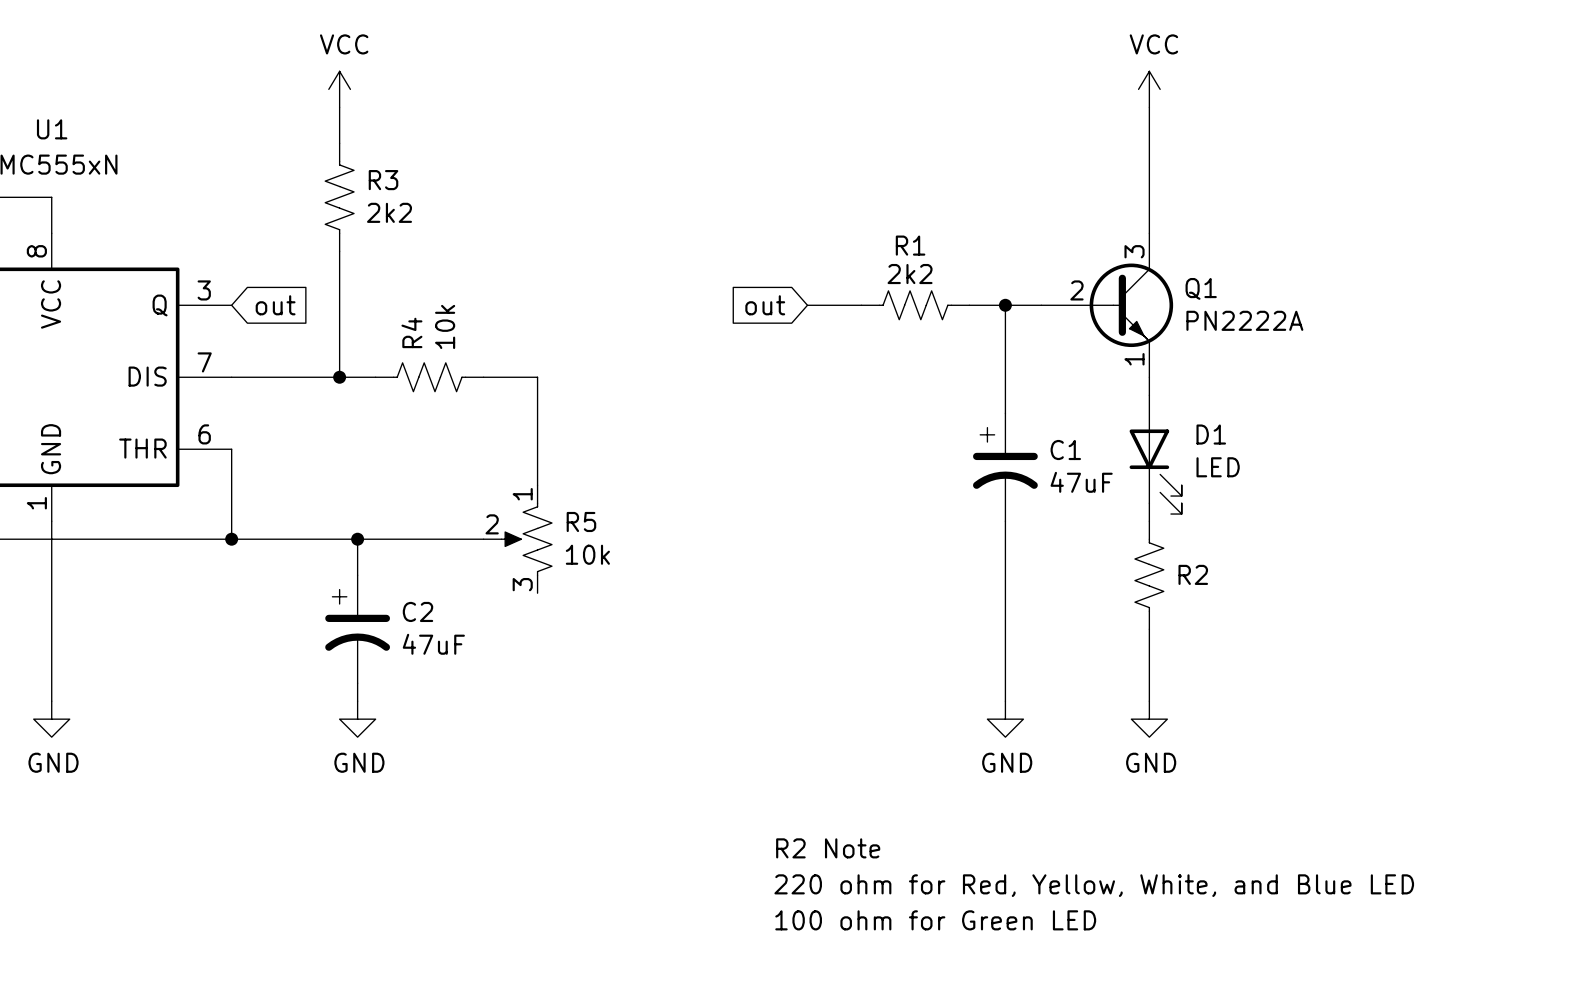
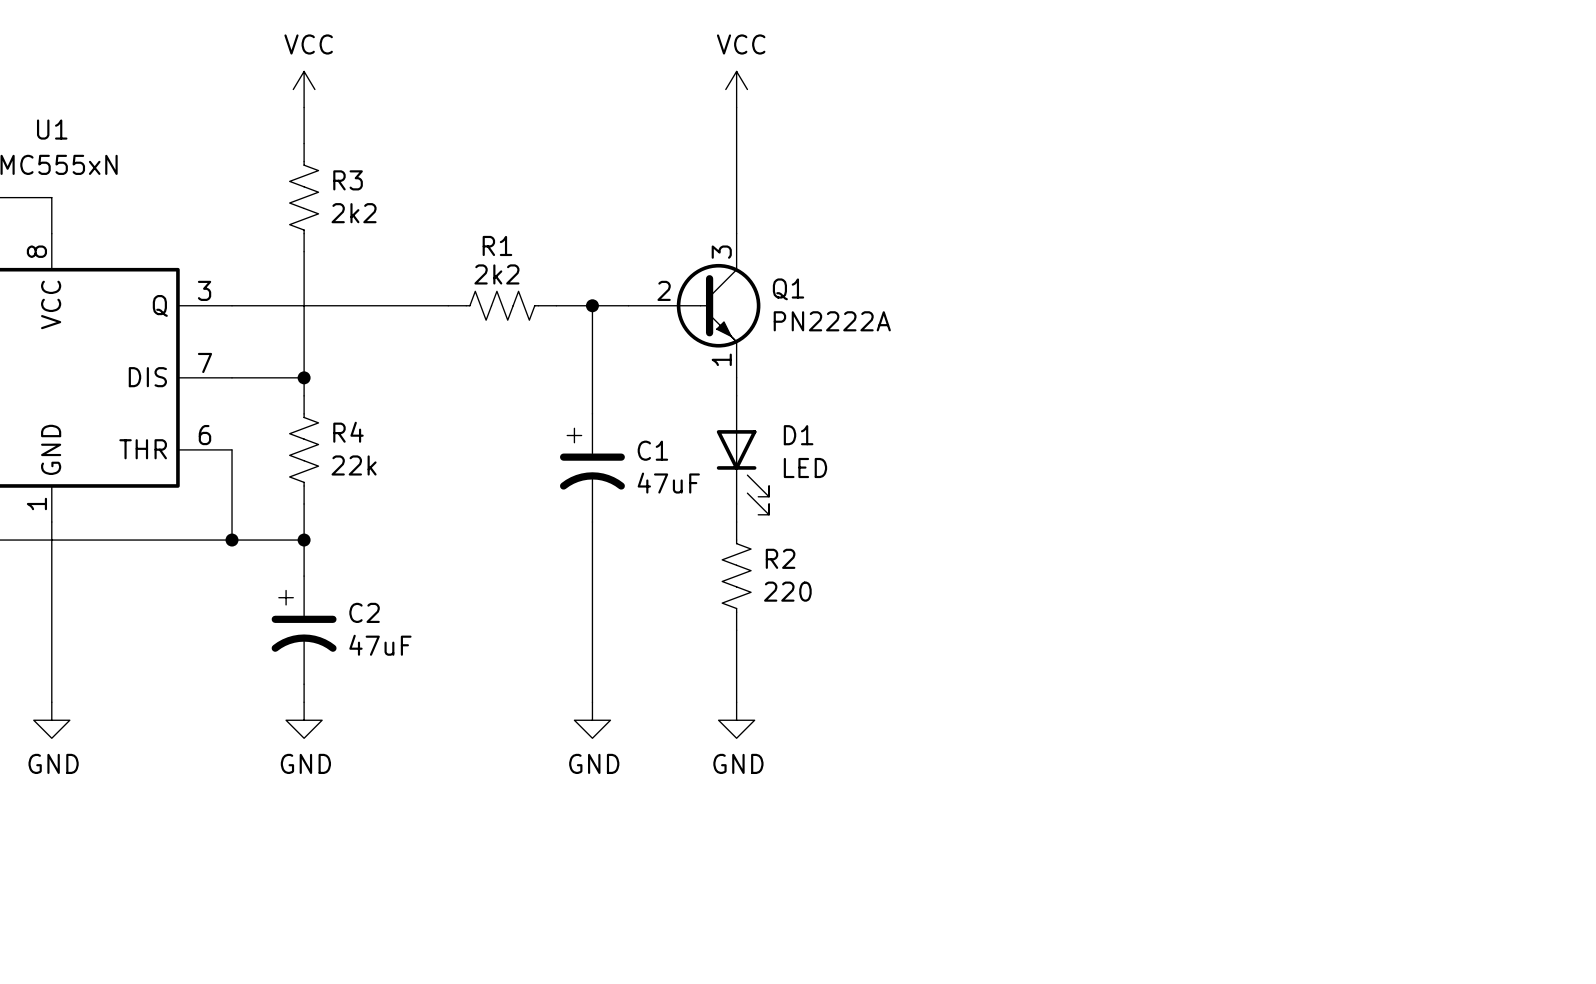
power symbol position: VCC (339, 89) -> VCC (304, 89)
power symbol: none -> VCC (736, 89)
power symbol: VCC (1149, 89) -> none
wire: (339, 107) (339, 143) -> (304, 107) (304, 143)
wire: none -> (736, 107) (736, 233)
wire: (1149, 107) (1149, 233) -> none
R3 position: (339, 197) -> (304, 197)
wire: none -> (304, 251) (304, 395)
wire: (339, 251) (339, 377) -> none
wire: none -> (232, 305) (448, 305)
global label: out (275, 305) -> none
wire: none -> (592, 305) (592, 413)
junction: none -> (592, 305)
global label: out (765, 305) -> none
wire: (807, 305) (861, 305) -> none
R1 position: (915, 305) -> (502, 305)
wire: (969, 305) (1041, 305) -> none
wire: (1005, 305) (1005, 413) -> none
junction: (1005, 305) -> none
Q1 position: (1107, 305) -> (694, 305)
R4 value: 10k (445, 326) -> 22k (354, 465)
wire: (303, 377) (375, 377) -> (556, 305) (628, 305)
junction position: (339, 377) -> (304, 377)
R4 rotation: 0° (429, 377) -> 90° clockwise (304, 449)
R4 position: (429, 377) -> (304, 449)
wire: (483, 377) (537, 377) (537, 485) -> none
wire: none -> (736, 377) (736, 395)
wire: (1149, 377) (1149, 395) -> none
D1 position: (1155, 454) -> (742, 455)
C1 position: (1005, 467) -> (592, 467)
wire: none -> (304, 503) (304, 576)
wire: none -> (736, 503) (736, 522)
wire: (1149, 503) (1149, 521) -> none
wire: none -> (592, 522) (592, 702)
wire: (1005, 521) (1005, 701) -> none
wire: (303, 539) (483, 539) -> none
wire: (357, 539) (357, 575) -> none
junction position: (357, 539) -> (304, 540)
R5: 10k (517, 539) -> none
R2 name position: R2 (1193, 574) -> R2 (780, 558)
R2 position: (1149, 575) -> (736, 576)
R2 value: none -> 220 (787, 591)
C2 position: (357, 629) -> (304, 630)
wire: none -> (736, 630) (736, 702)
wire: (1149, 629) (1149, 701) -> none
wire: (357, 683) (357, 701) -> (304, 684) (304, 702)
power symbol position: GND (357, 719) -> GND (304, 720)
power symbol: none -> GND (592, 720)
power symbol: none -> GND (736, 720)
power symbol: GND (1005, 719) -> none
power symbol: GND (1149, 719) -> none
text: R2 Note (828, 848) -> none
text: 220 ohm for Red, Yellow, White, and Blue LED (1094, 885) -> none
text: 100 ohm for Green LED (935, 920) -> none

